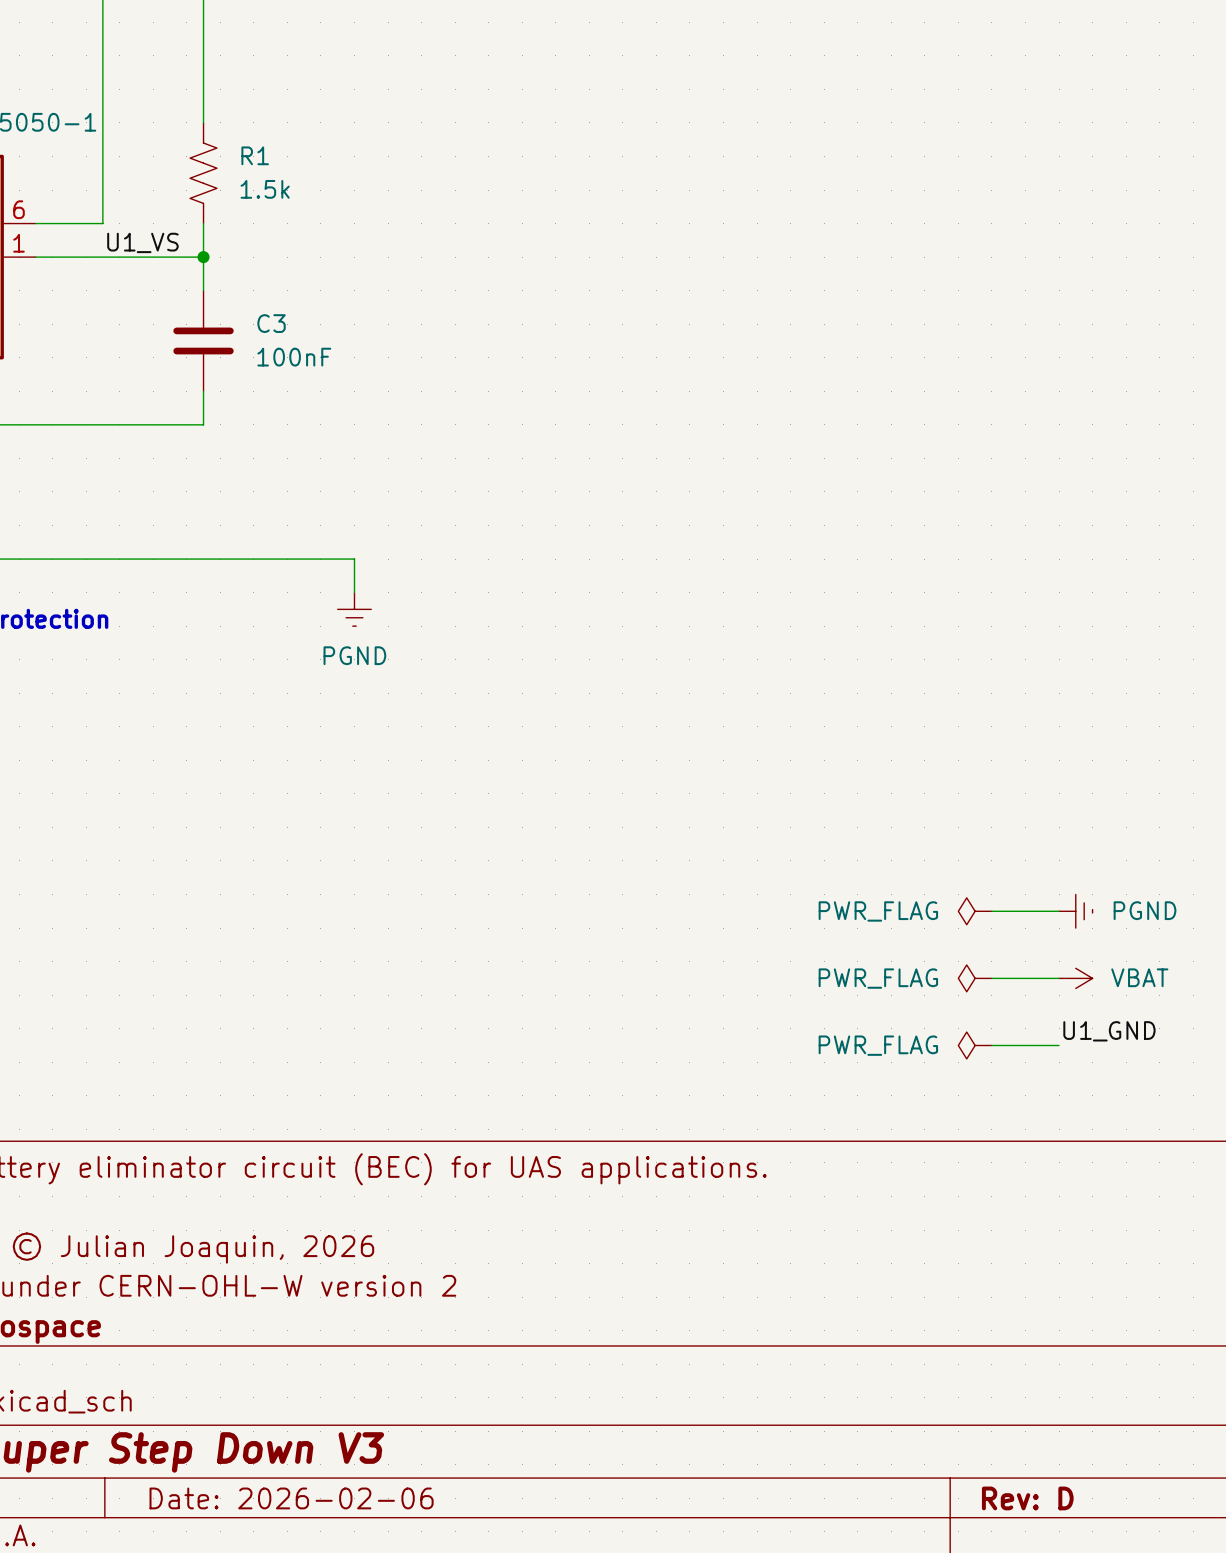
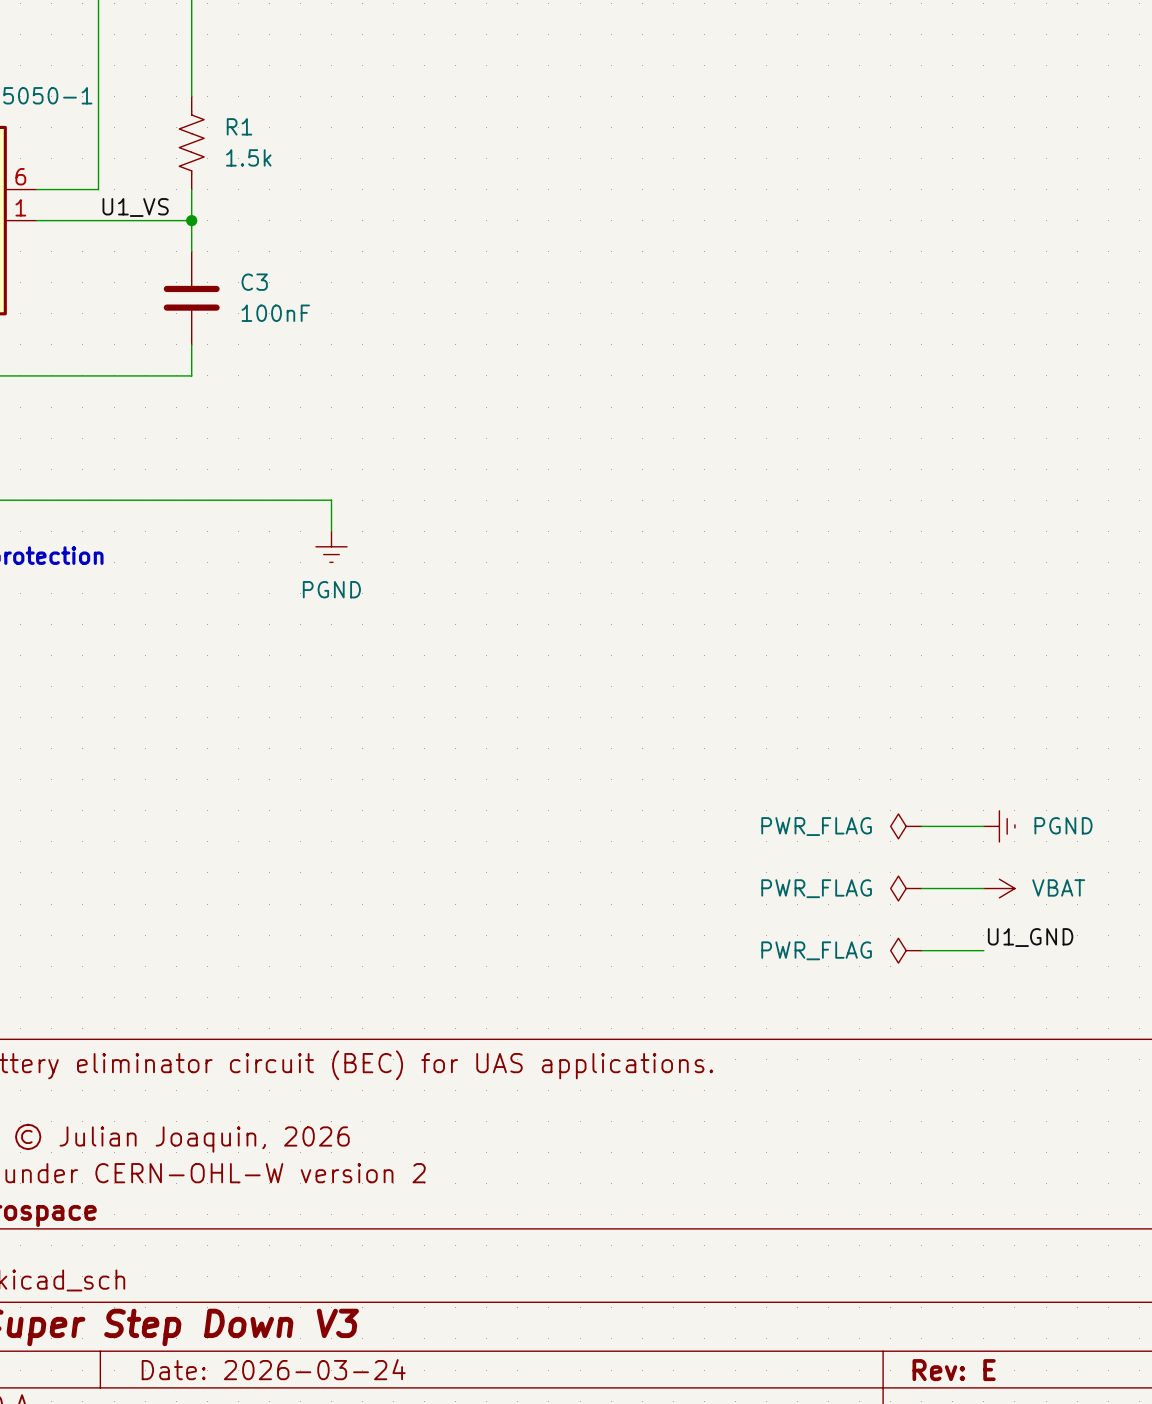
title block: Date: 2026-02-06 (291, 1498) -> Date: 2026-03-24 (273, 1369)
title block: Rev: D (1027, 1498) -> Rev: E (954, 1370)

